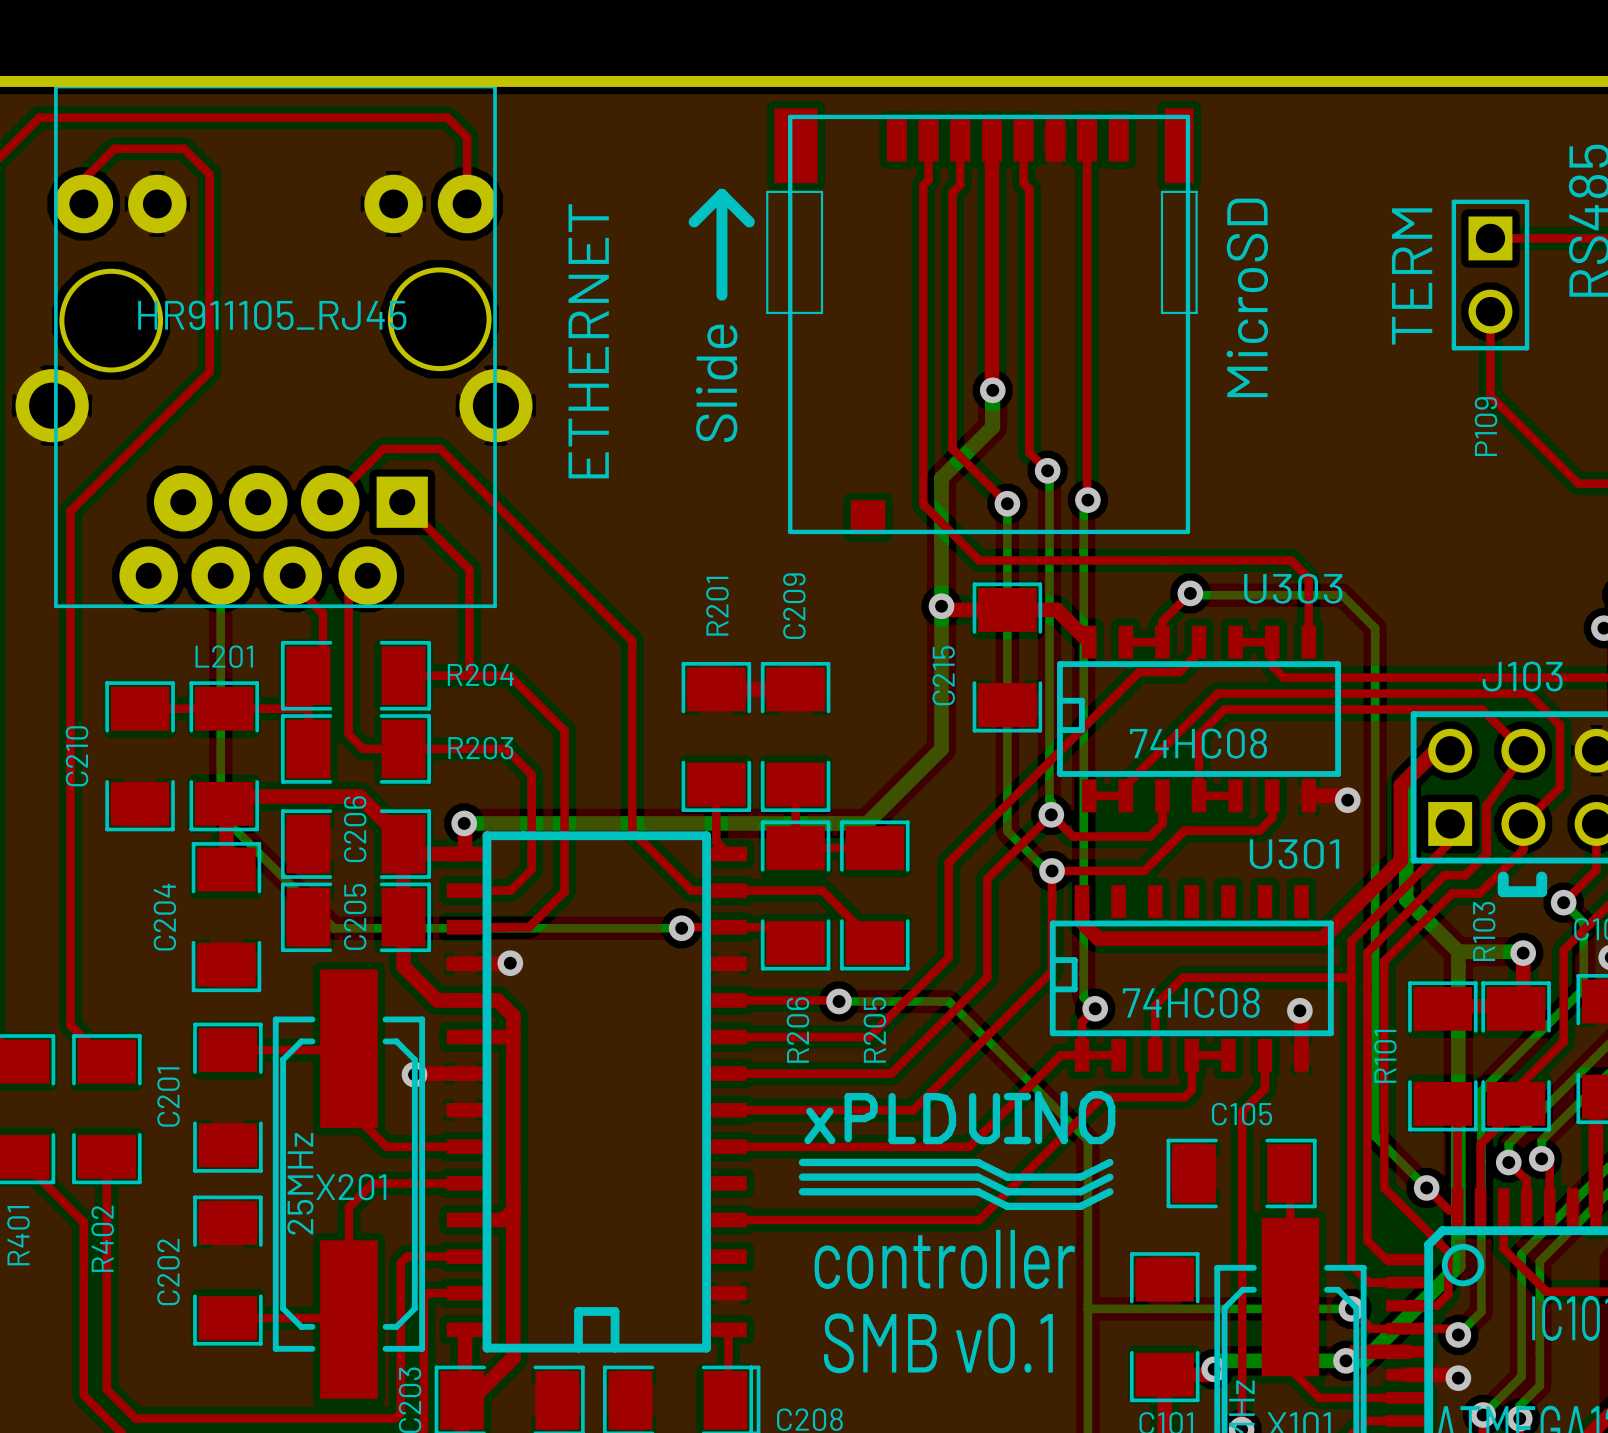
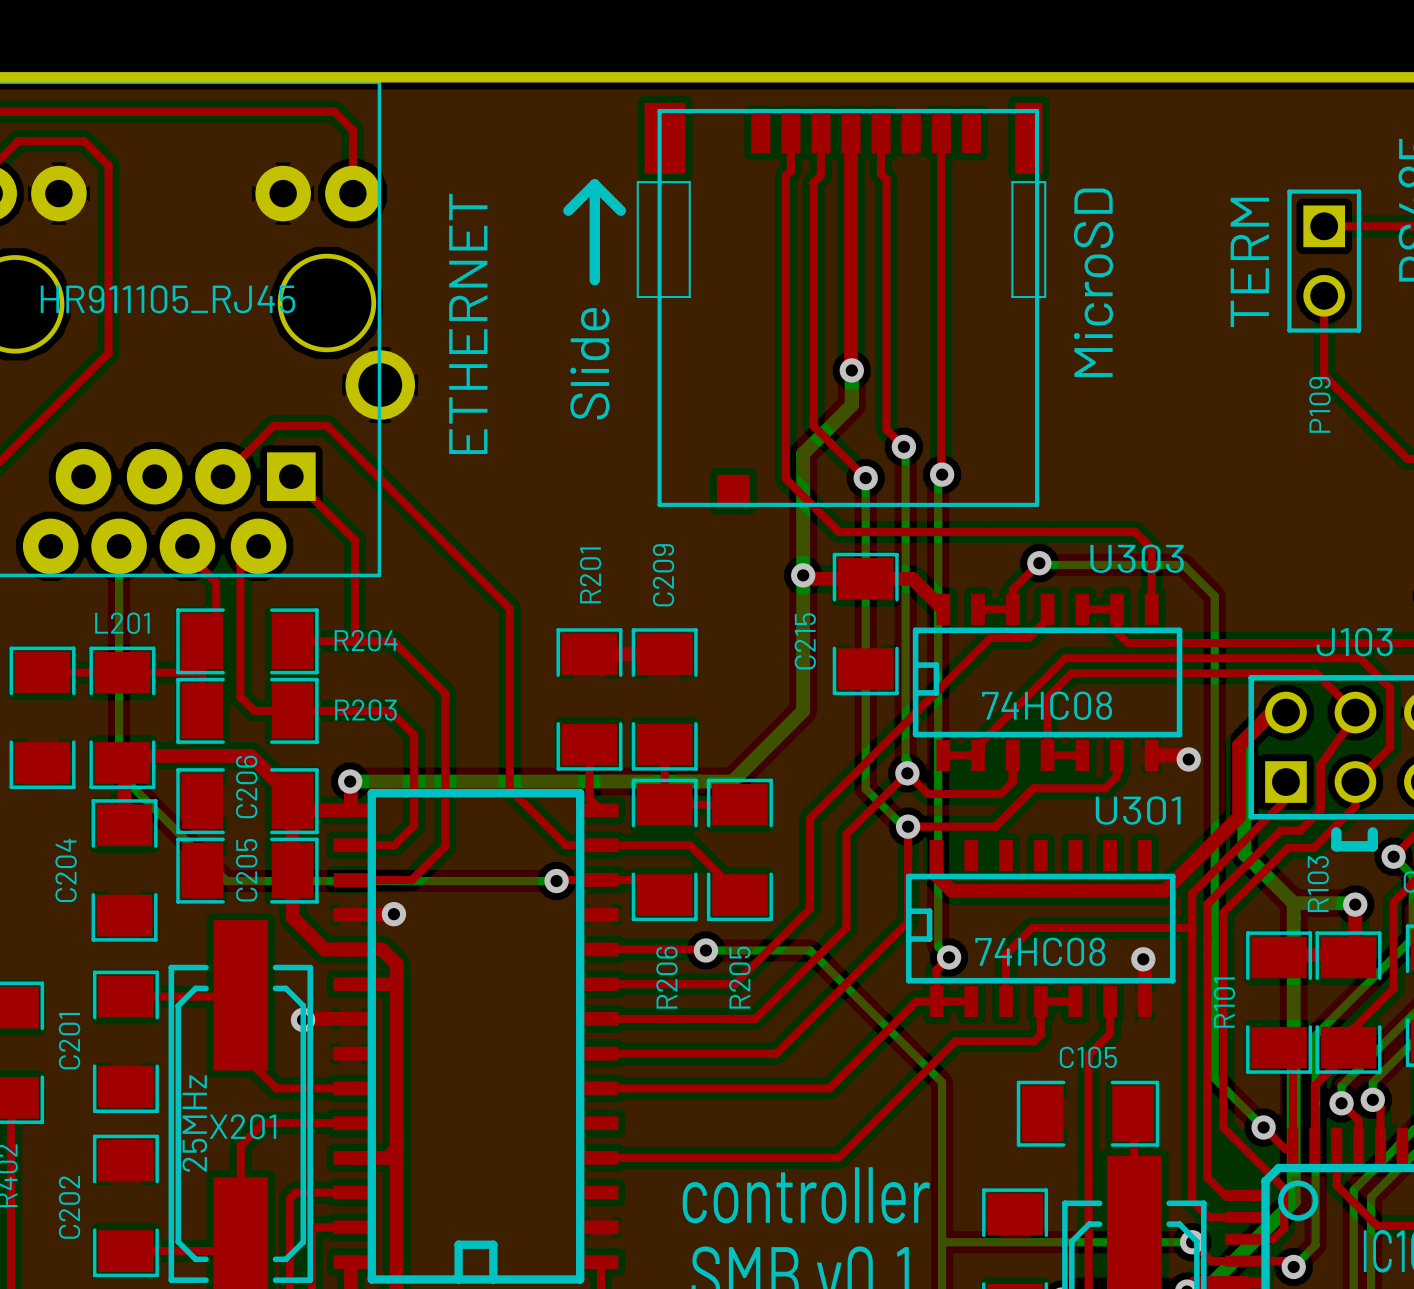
drawing: [798, 1091, 1116, 1211] -> none

